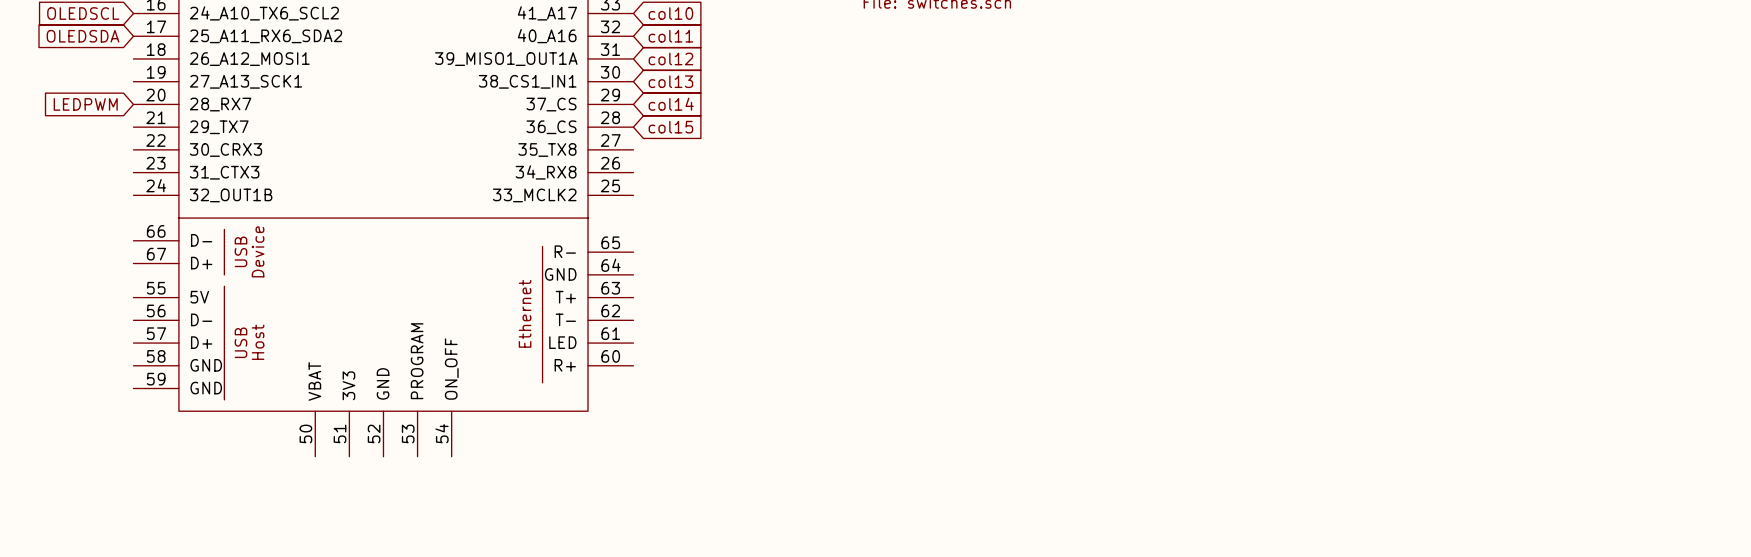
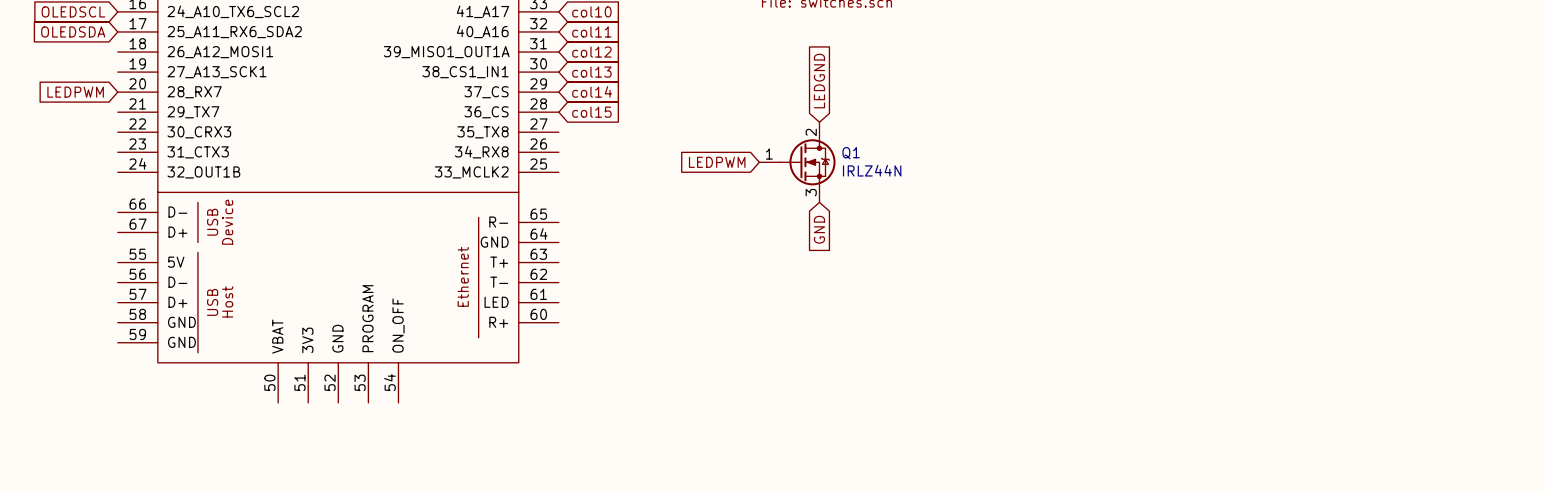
global label: none -> LEDGND (819, 81)
global label: none -> LEDPWM (717, 162)
Q1: none -> IRLZ44N (797, 162)
global label: none -> GND (819, 229)

